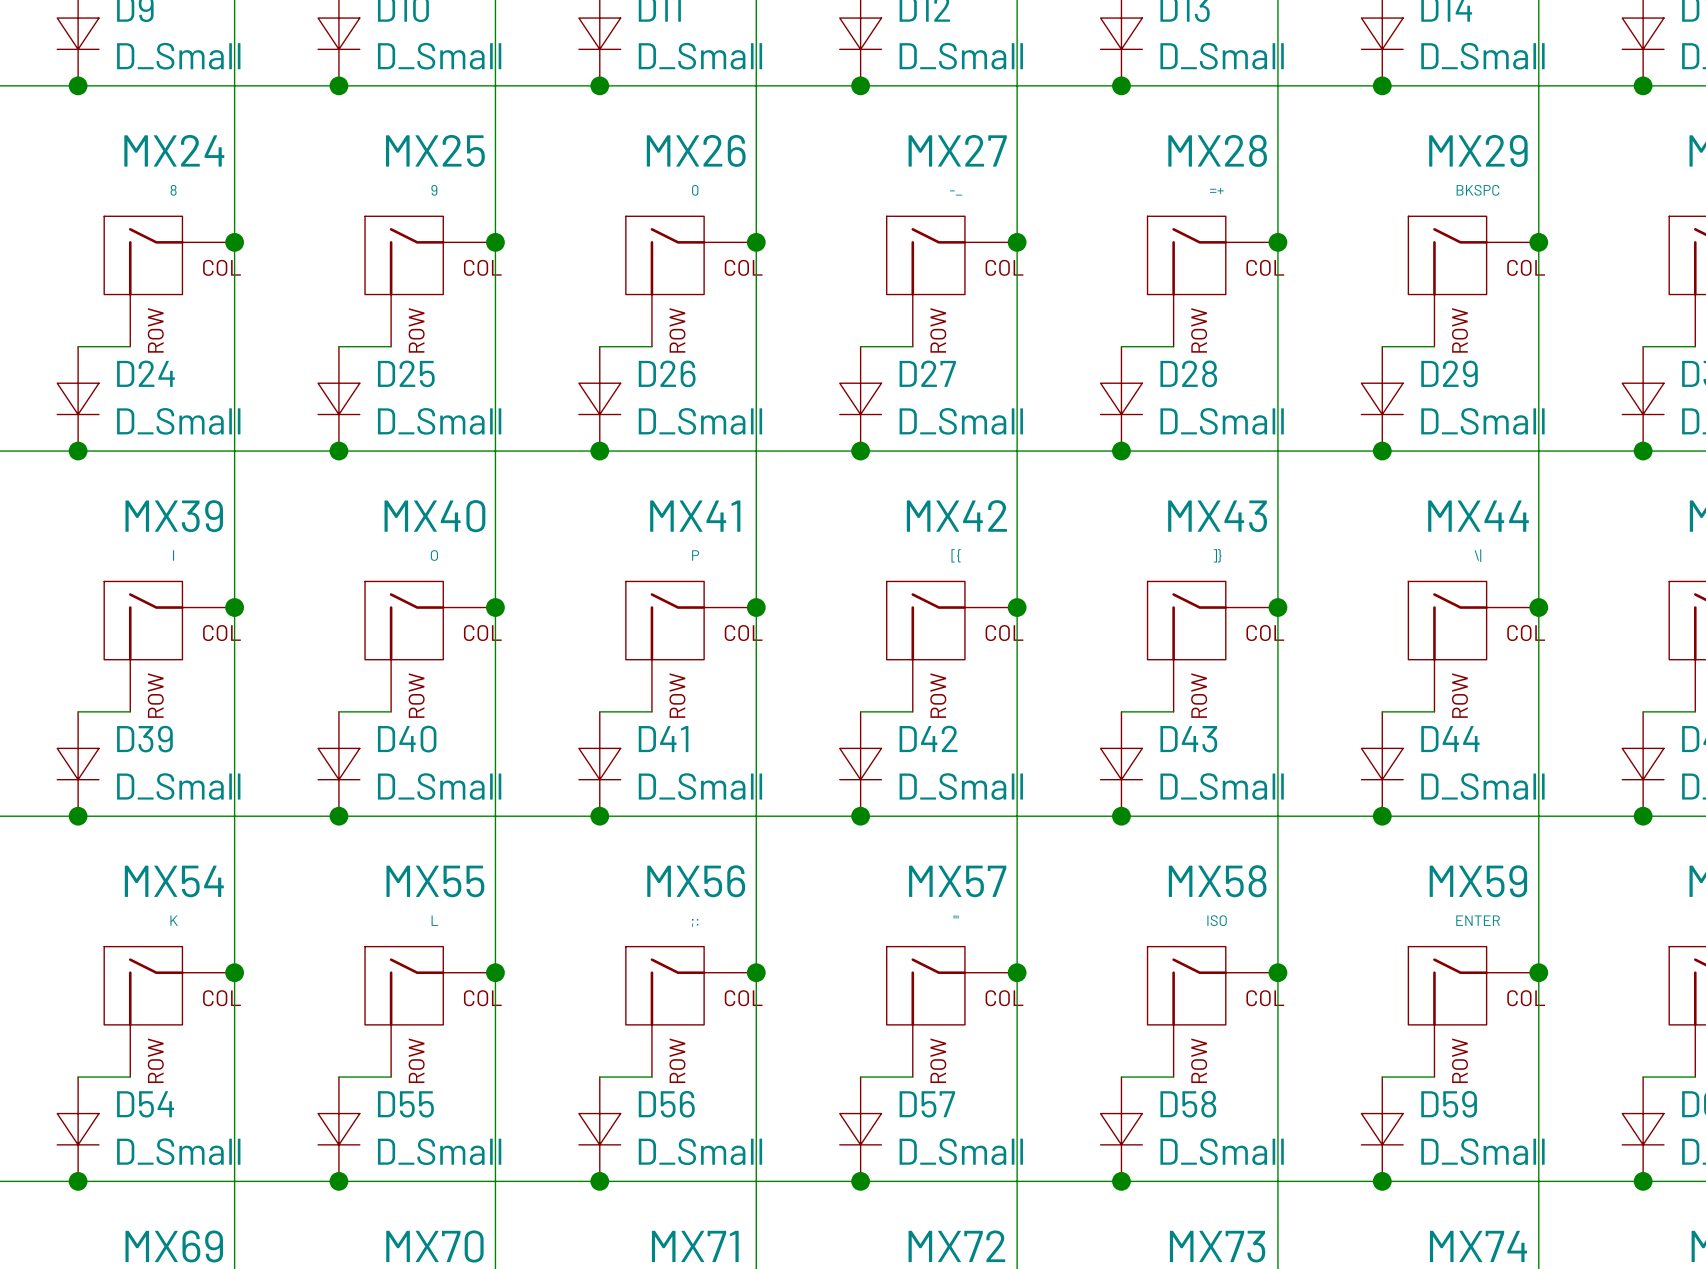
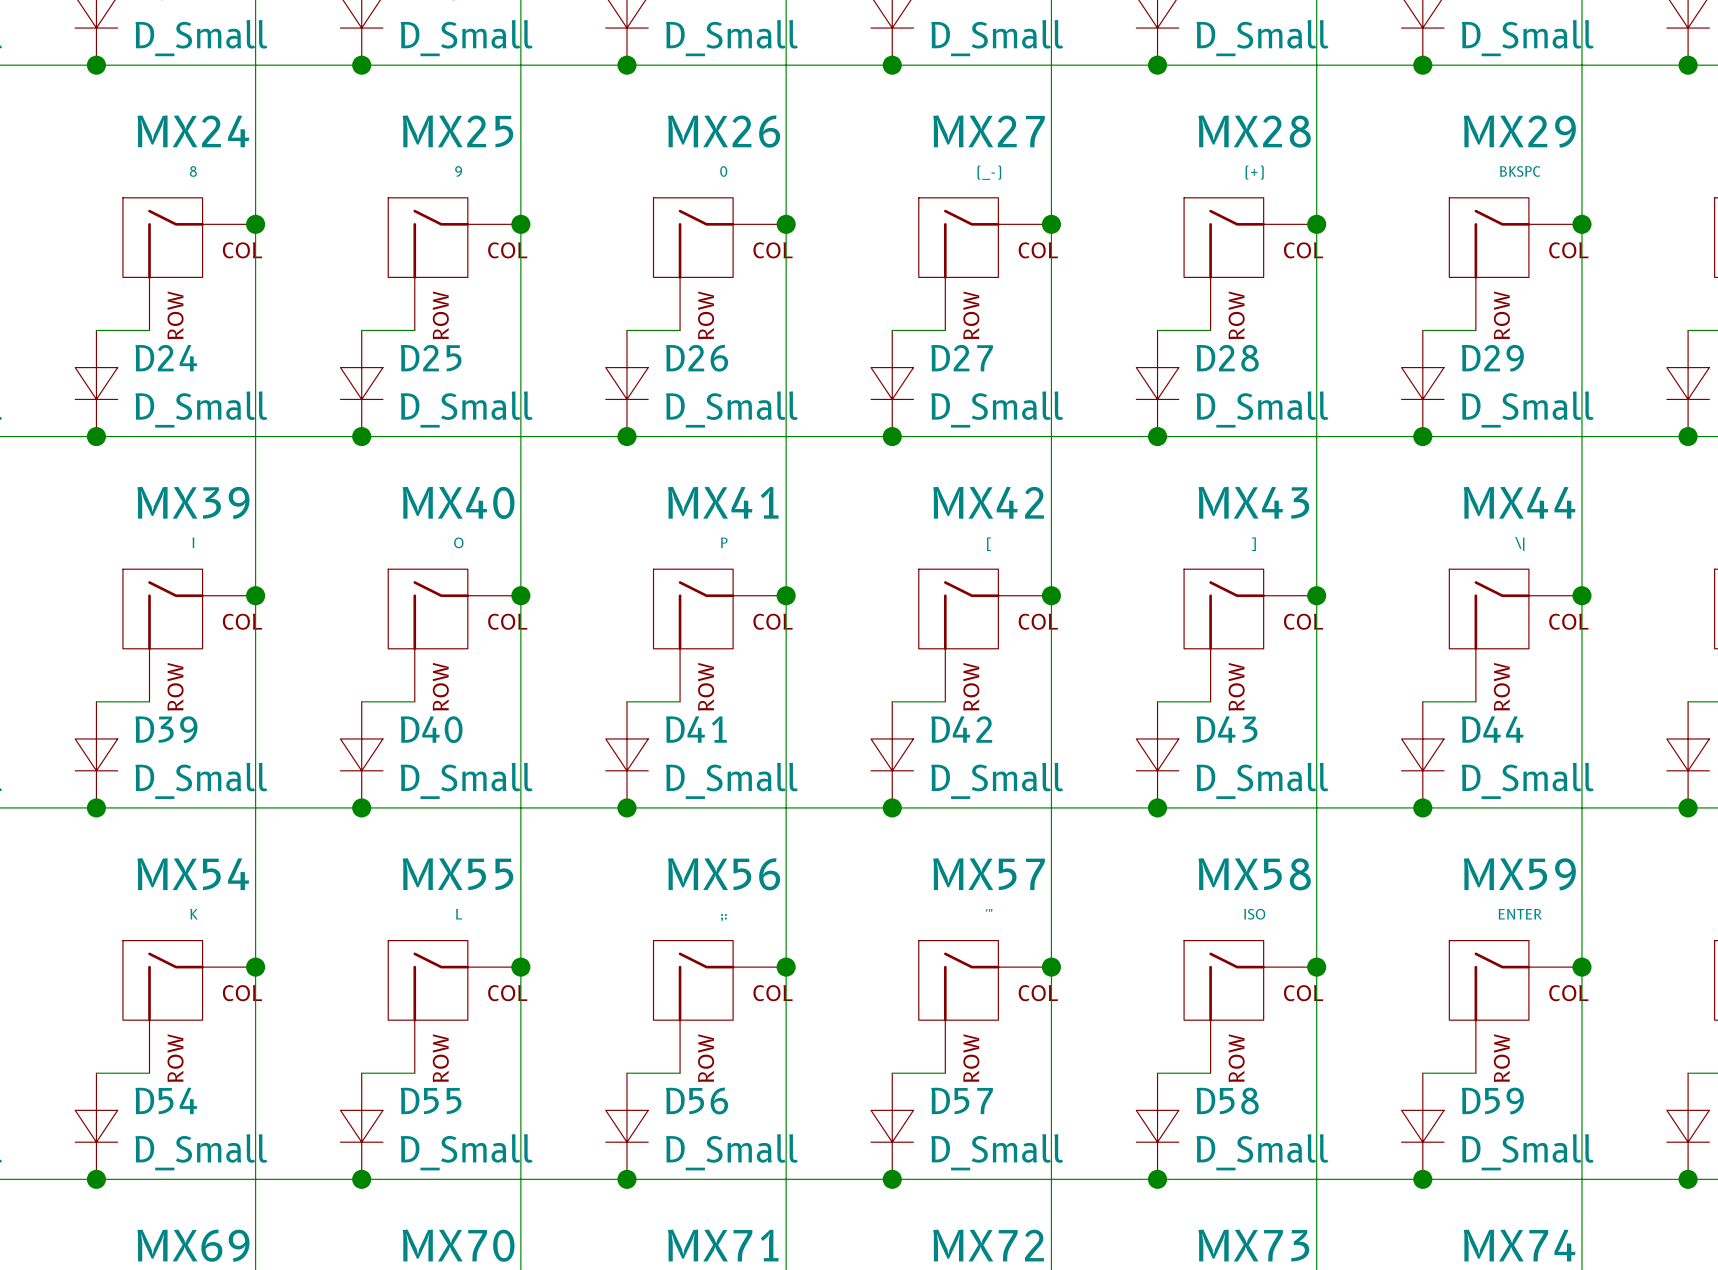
MX28 value: =+ (1216, 190) -> (+) (1254, 172)
MX27 value: -_ (956, 193) -> (_-) (989, 172)
MX42 value: [{ (956, 555) -> [ (988, 544)
MX43 value: ]} (1217, 555) -> ] (1254, 544)

